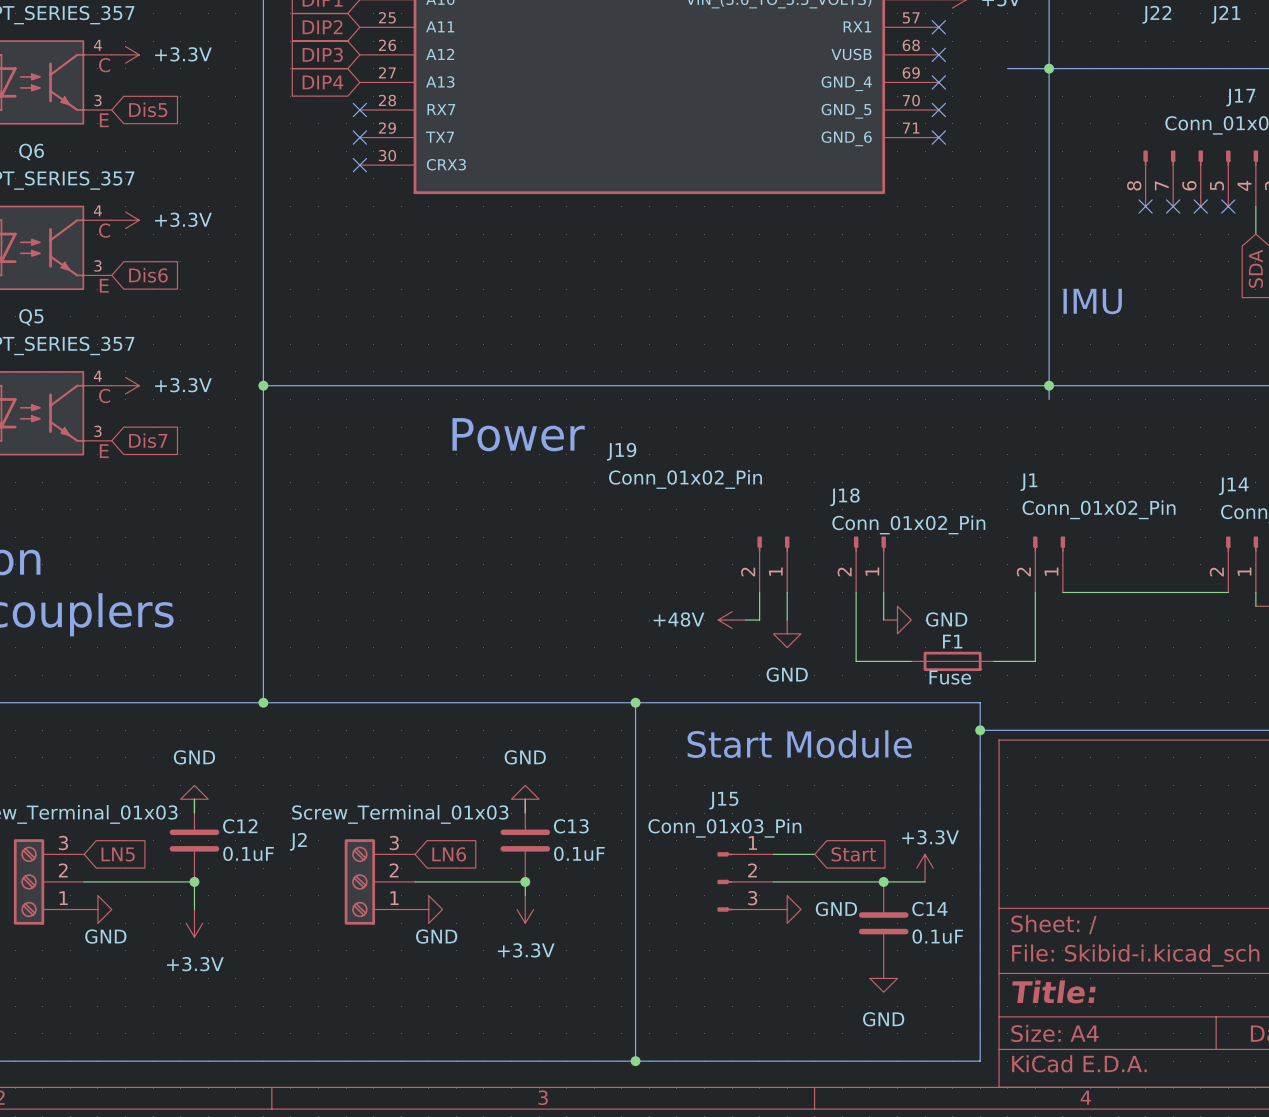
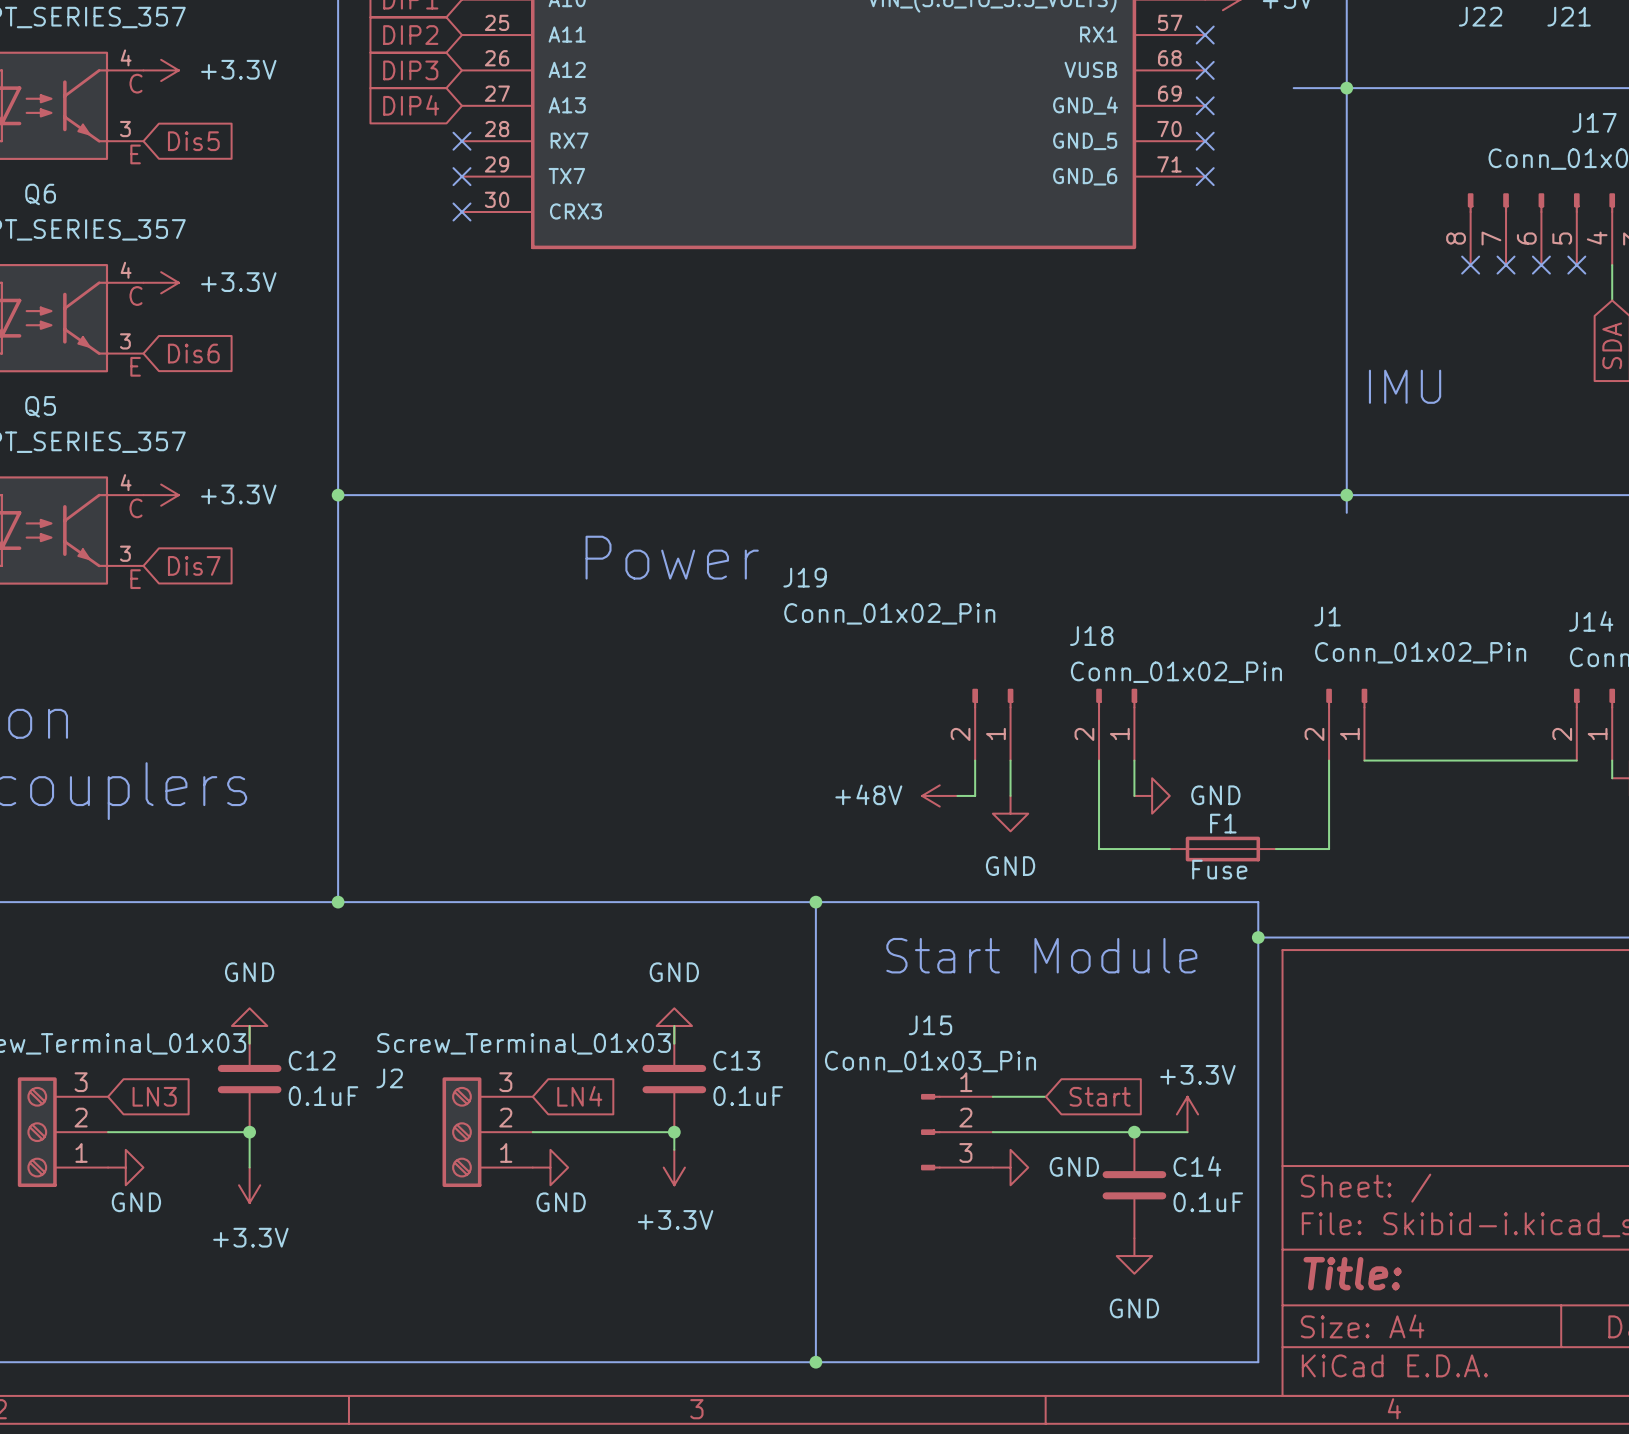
global label: LN5 (118, 854) -> LN3 (154, 1096)
global label: LN6 (449, 854) -> LN4 (579, 1096)

